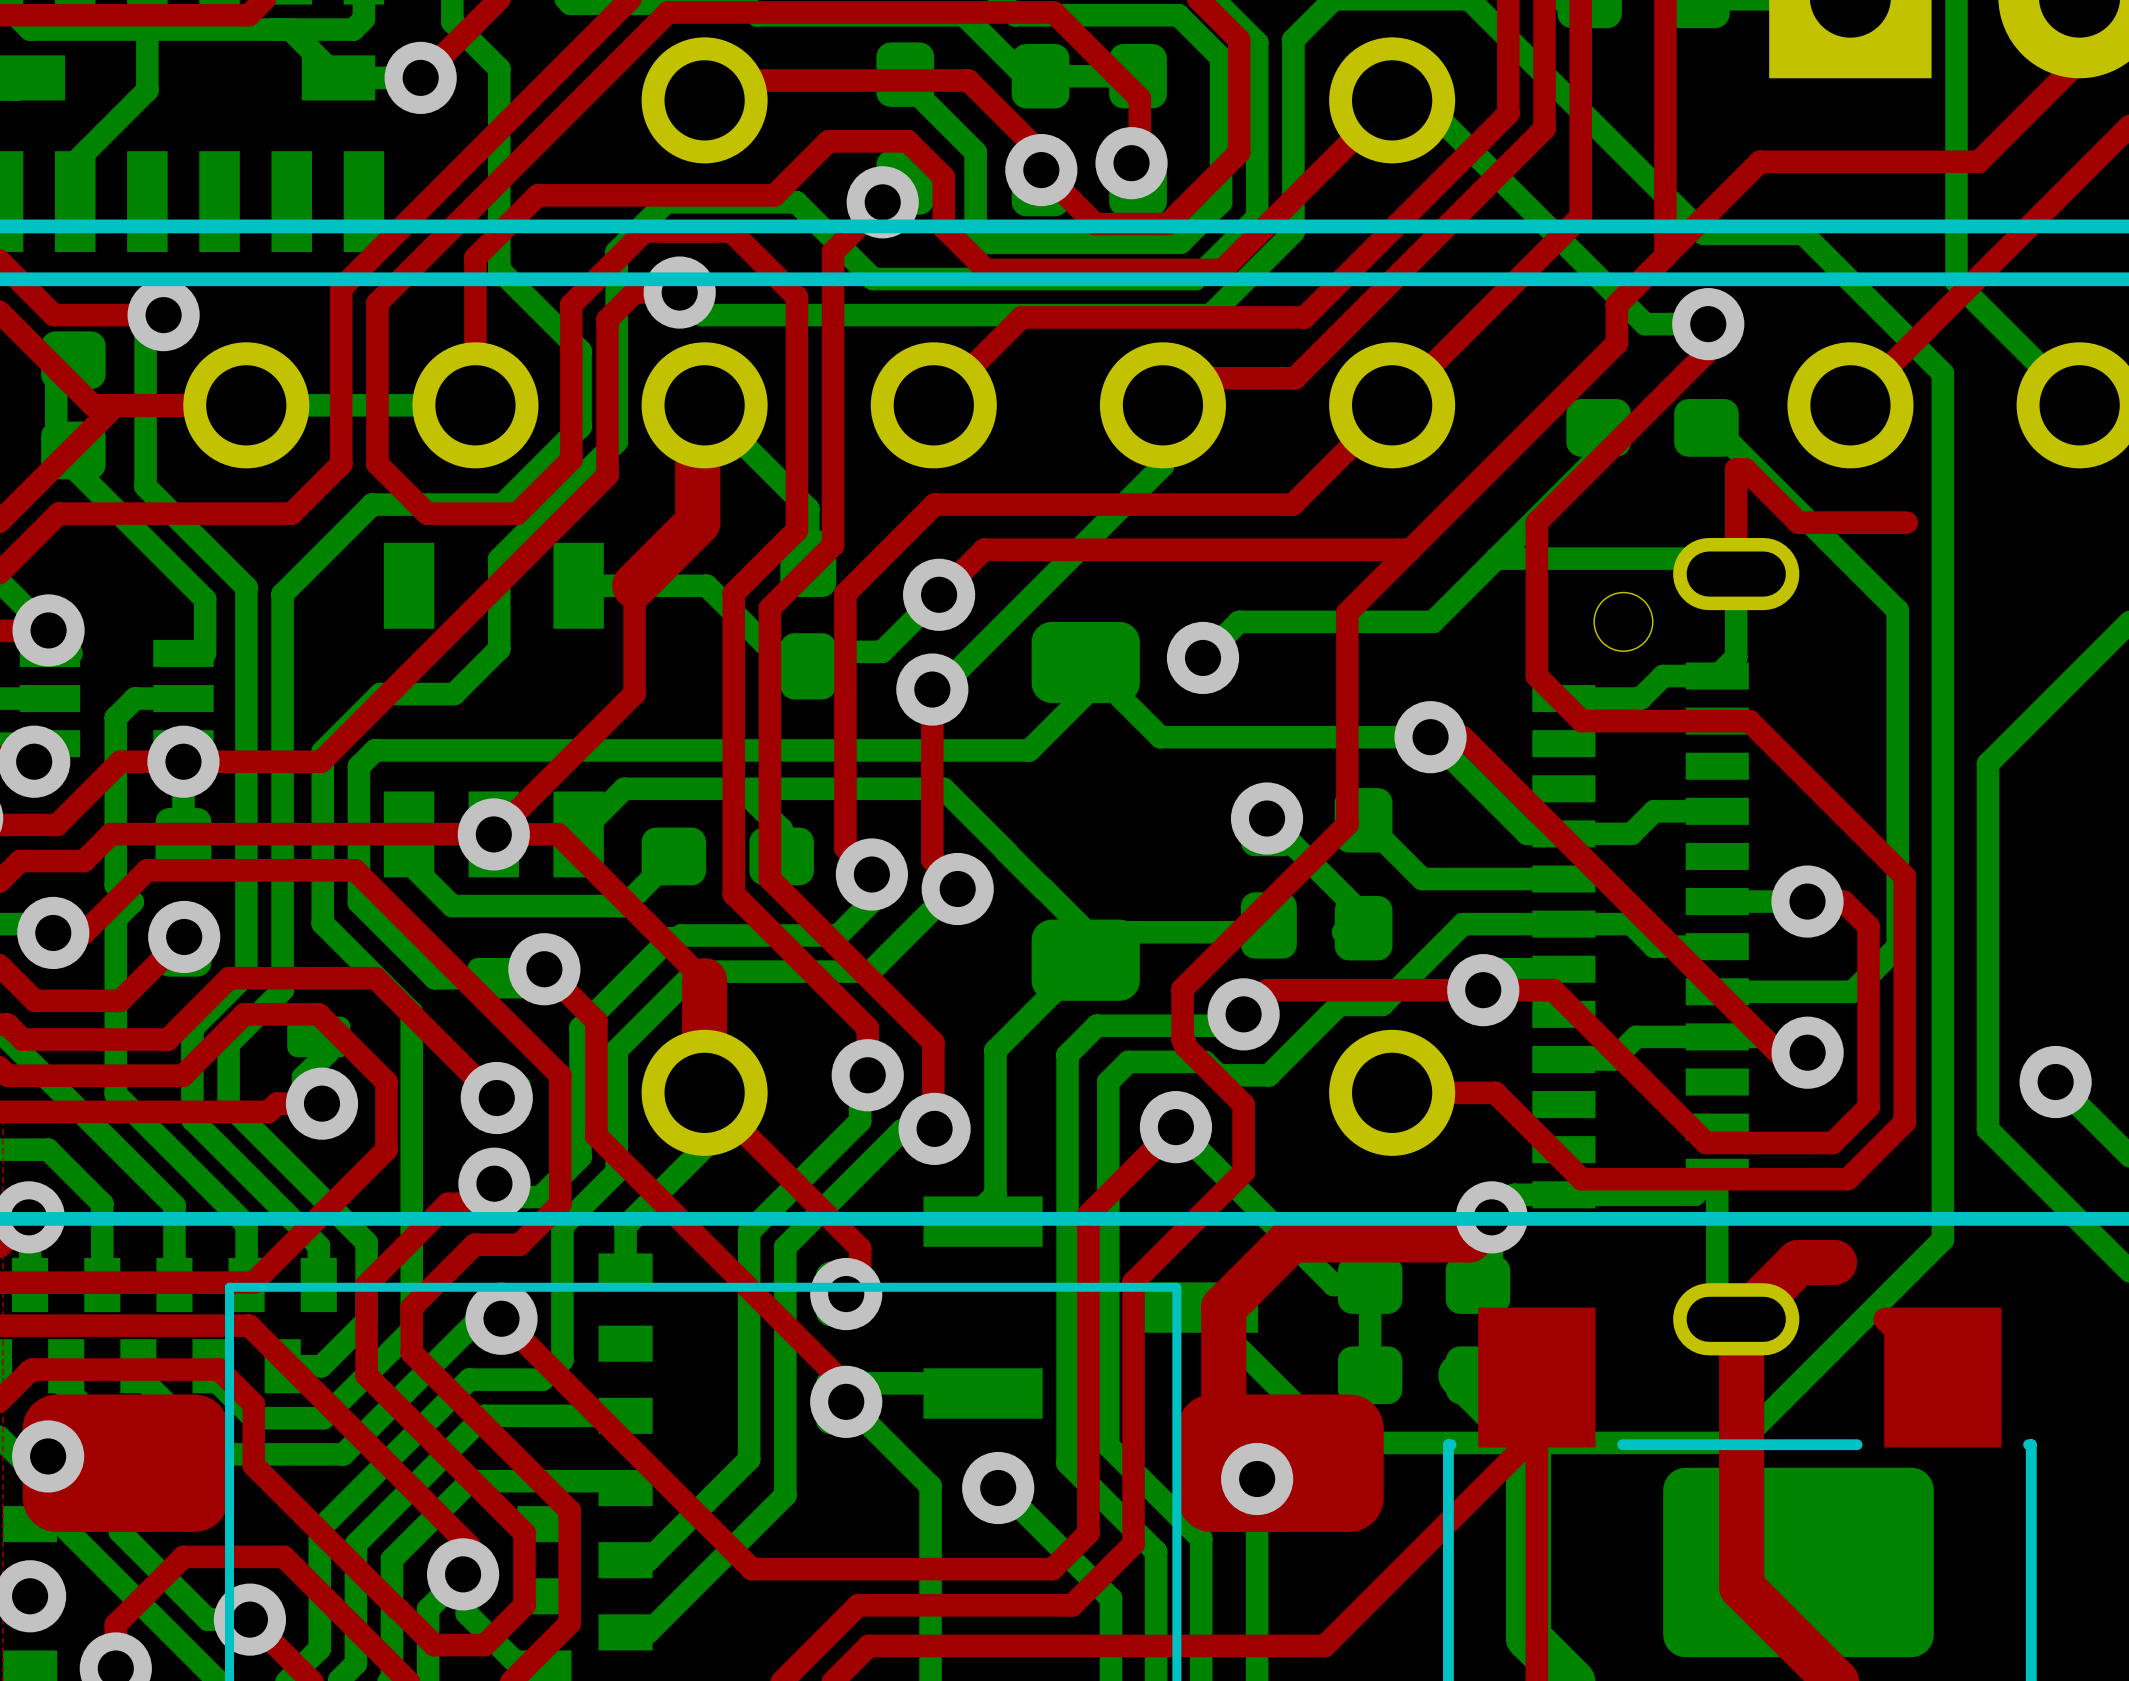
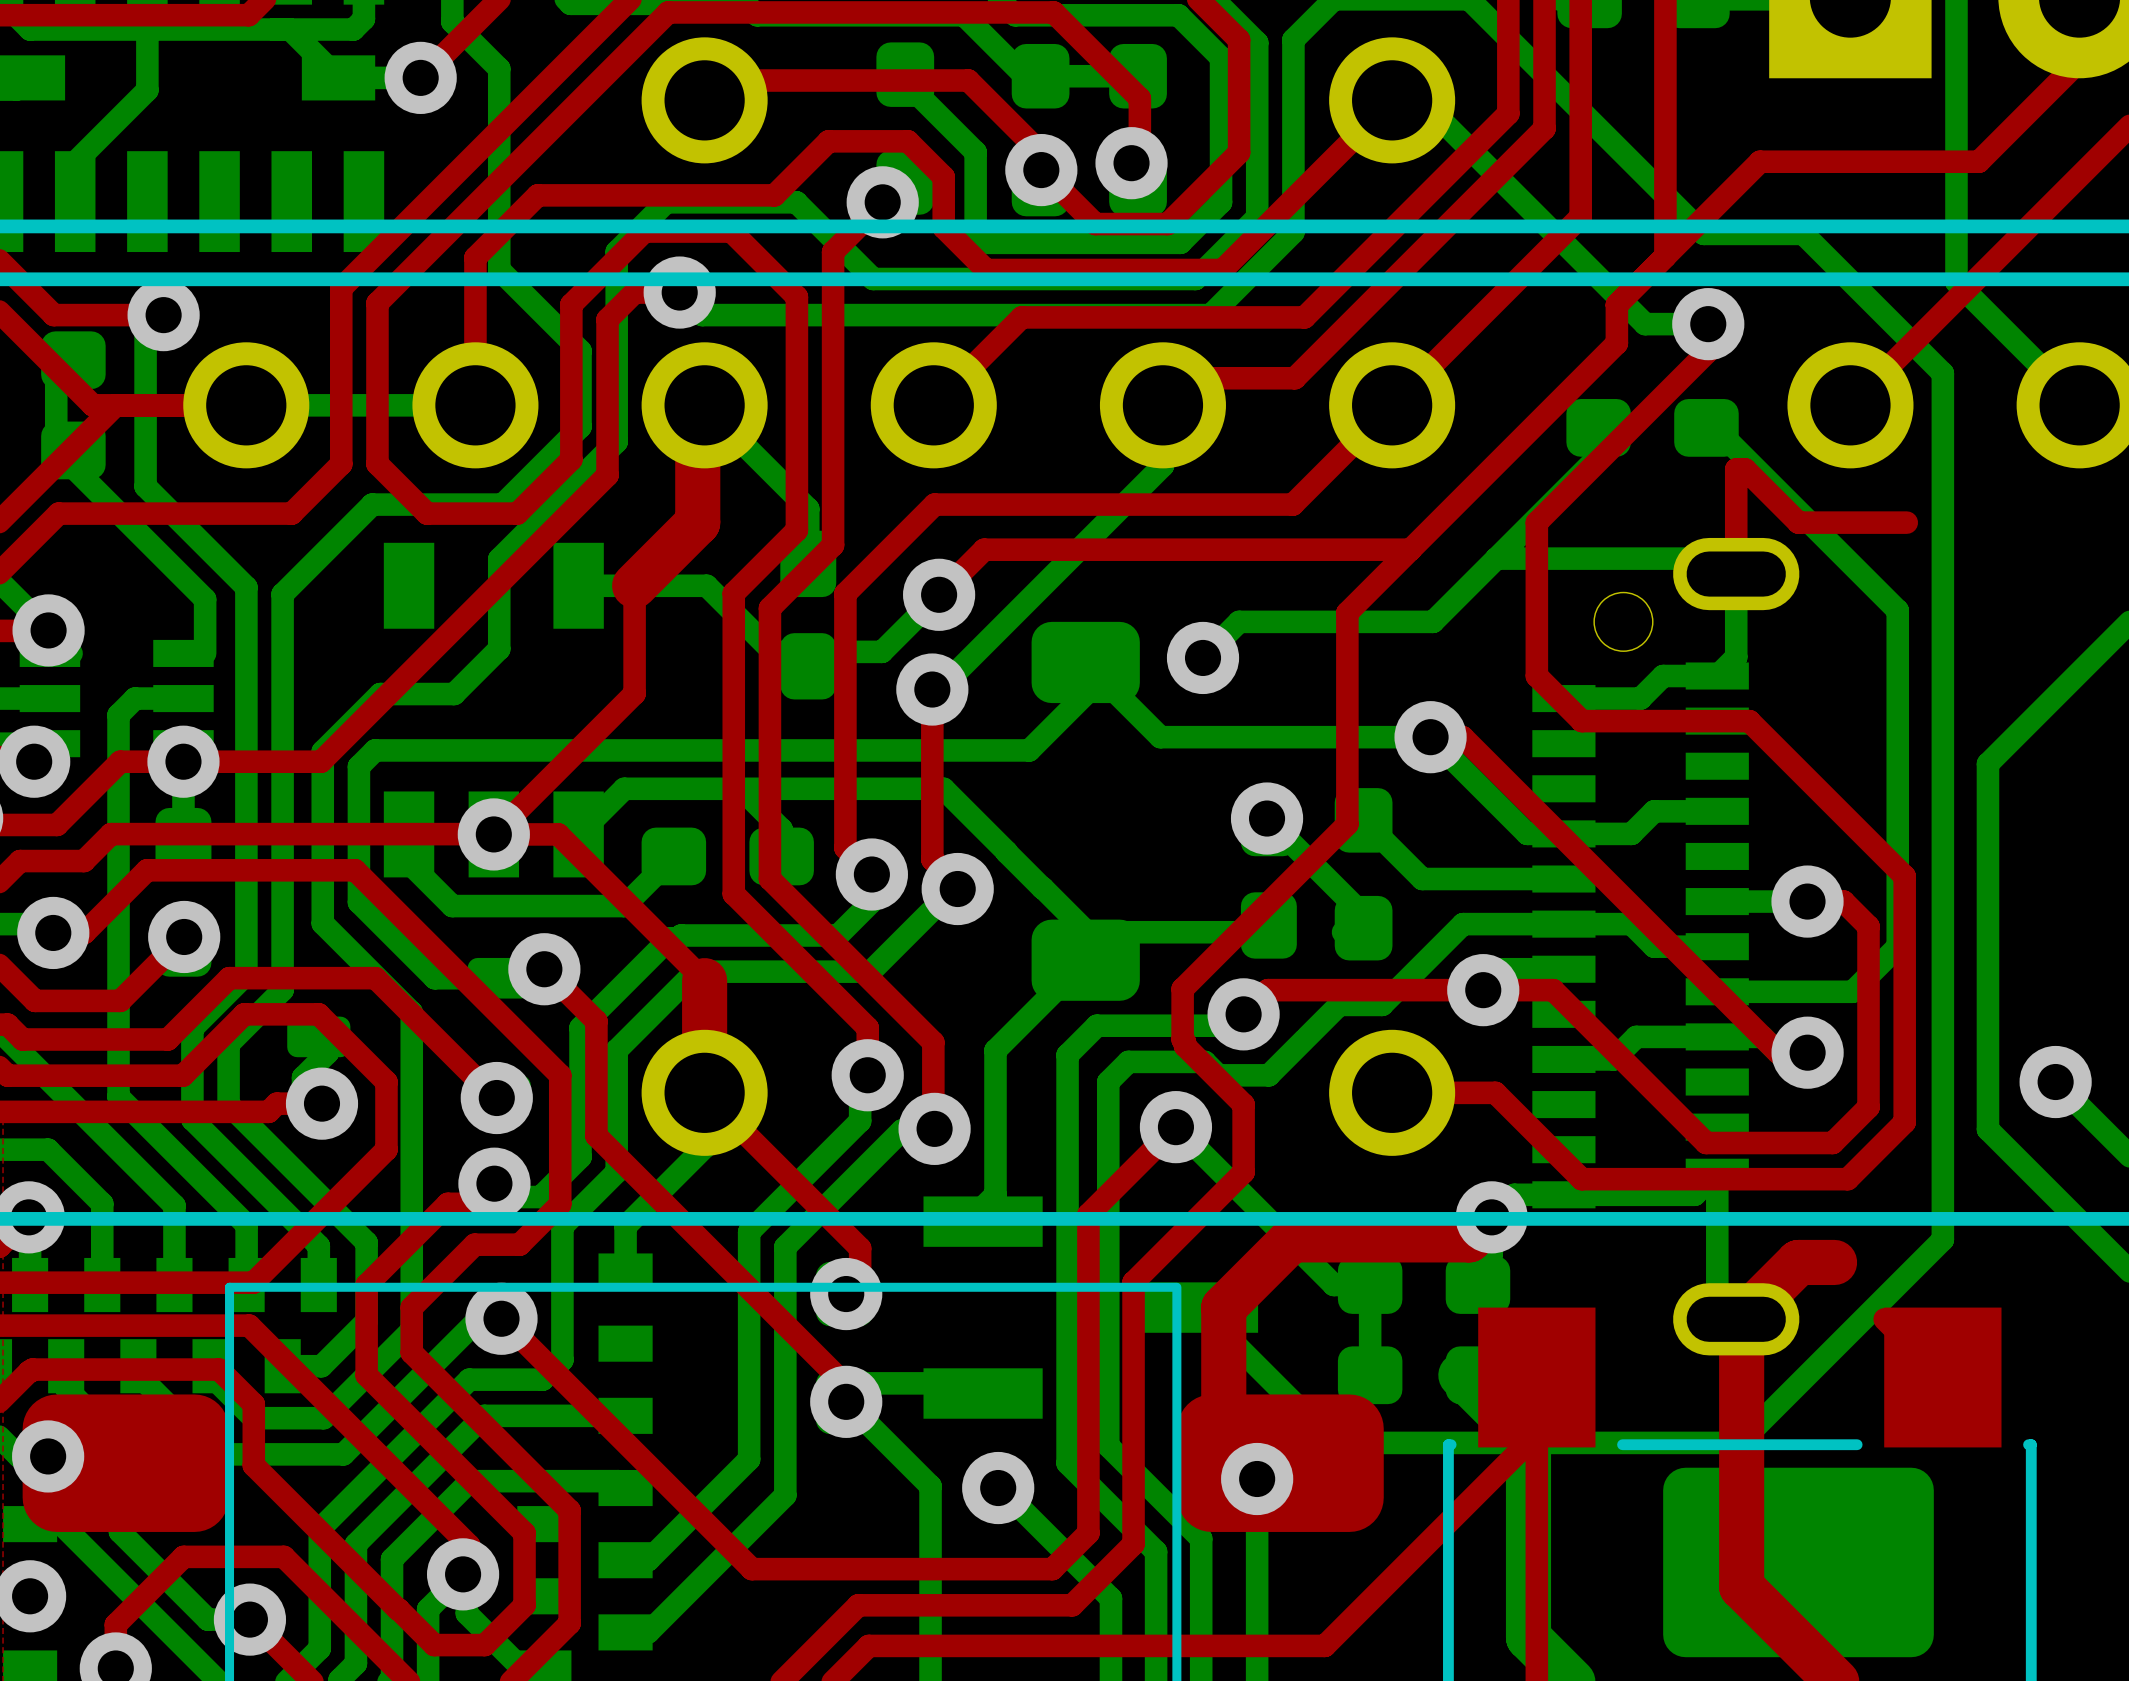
bottom track: (118, 715) (115, 717) (115, 885) (132, 902) (115, 918) (115, 1094) (118, 1096) -> (118, 715) (118, 1096)

